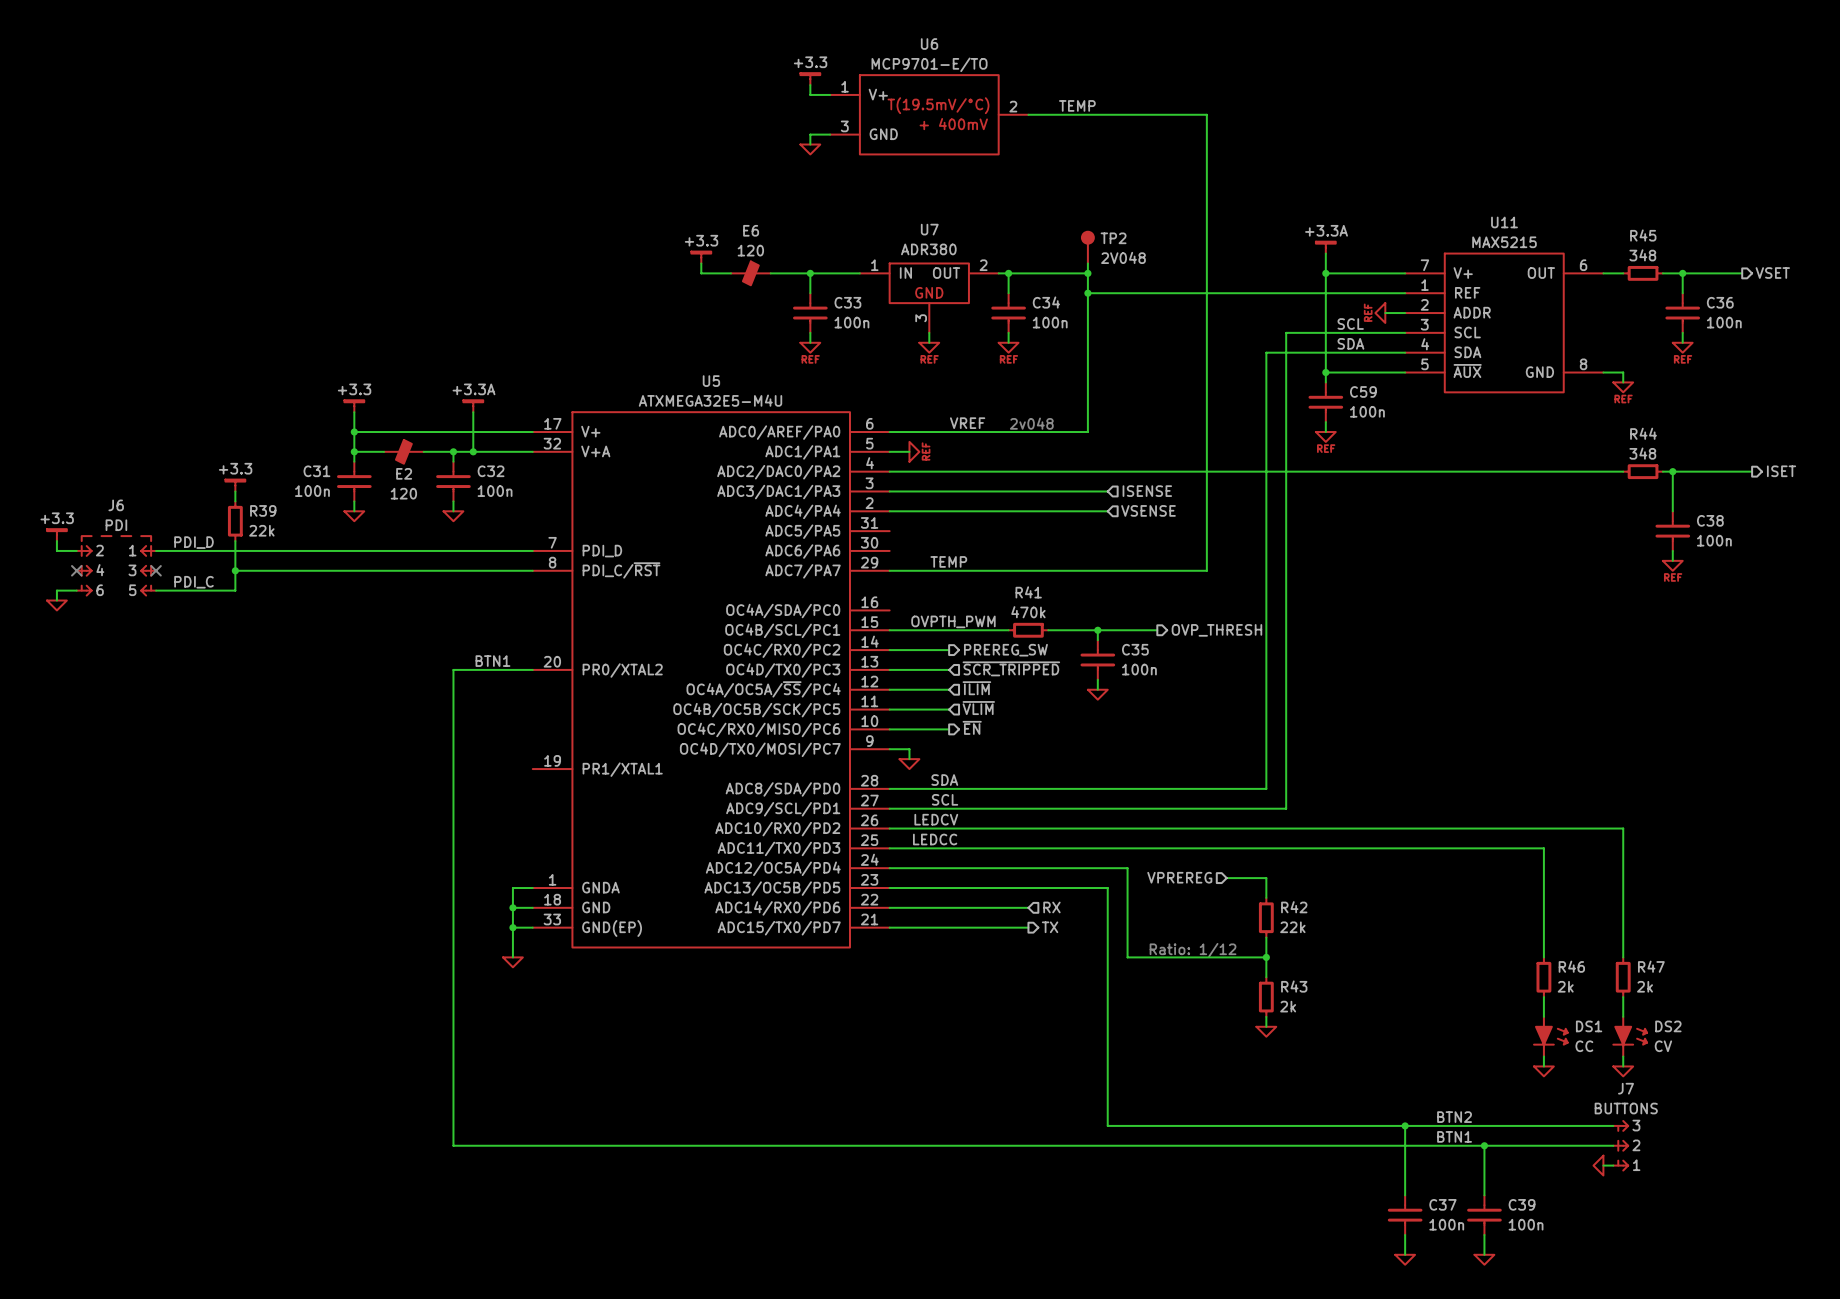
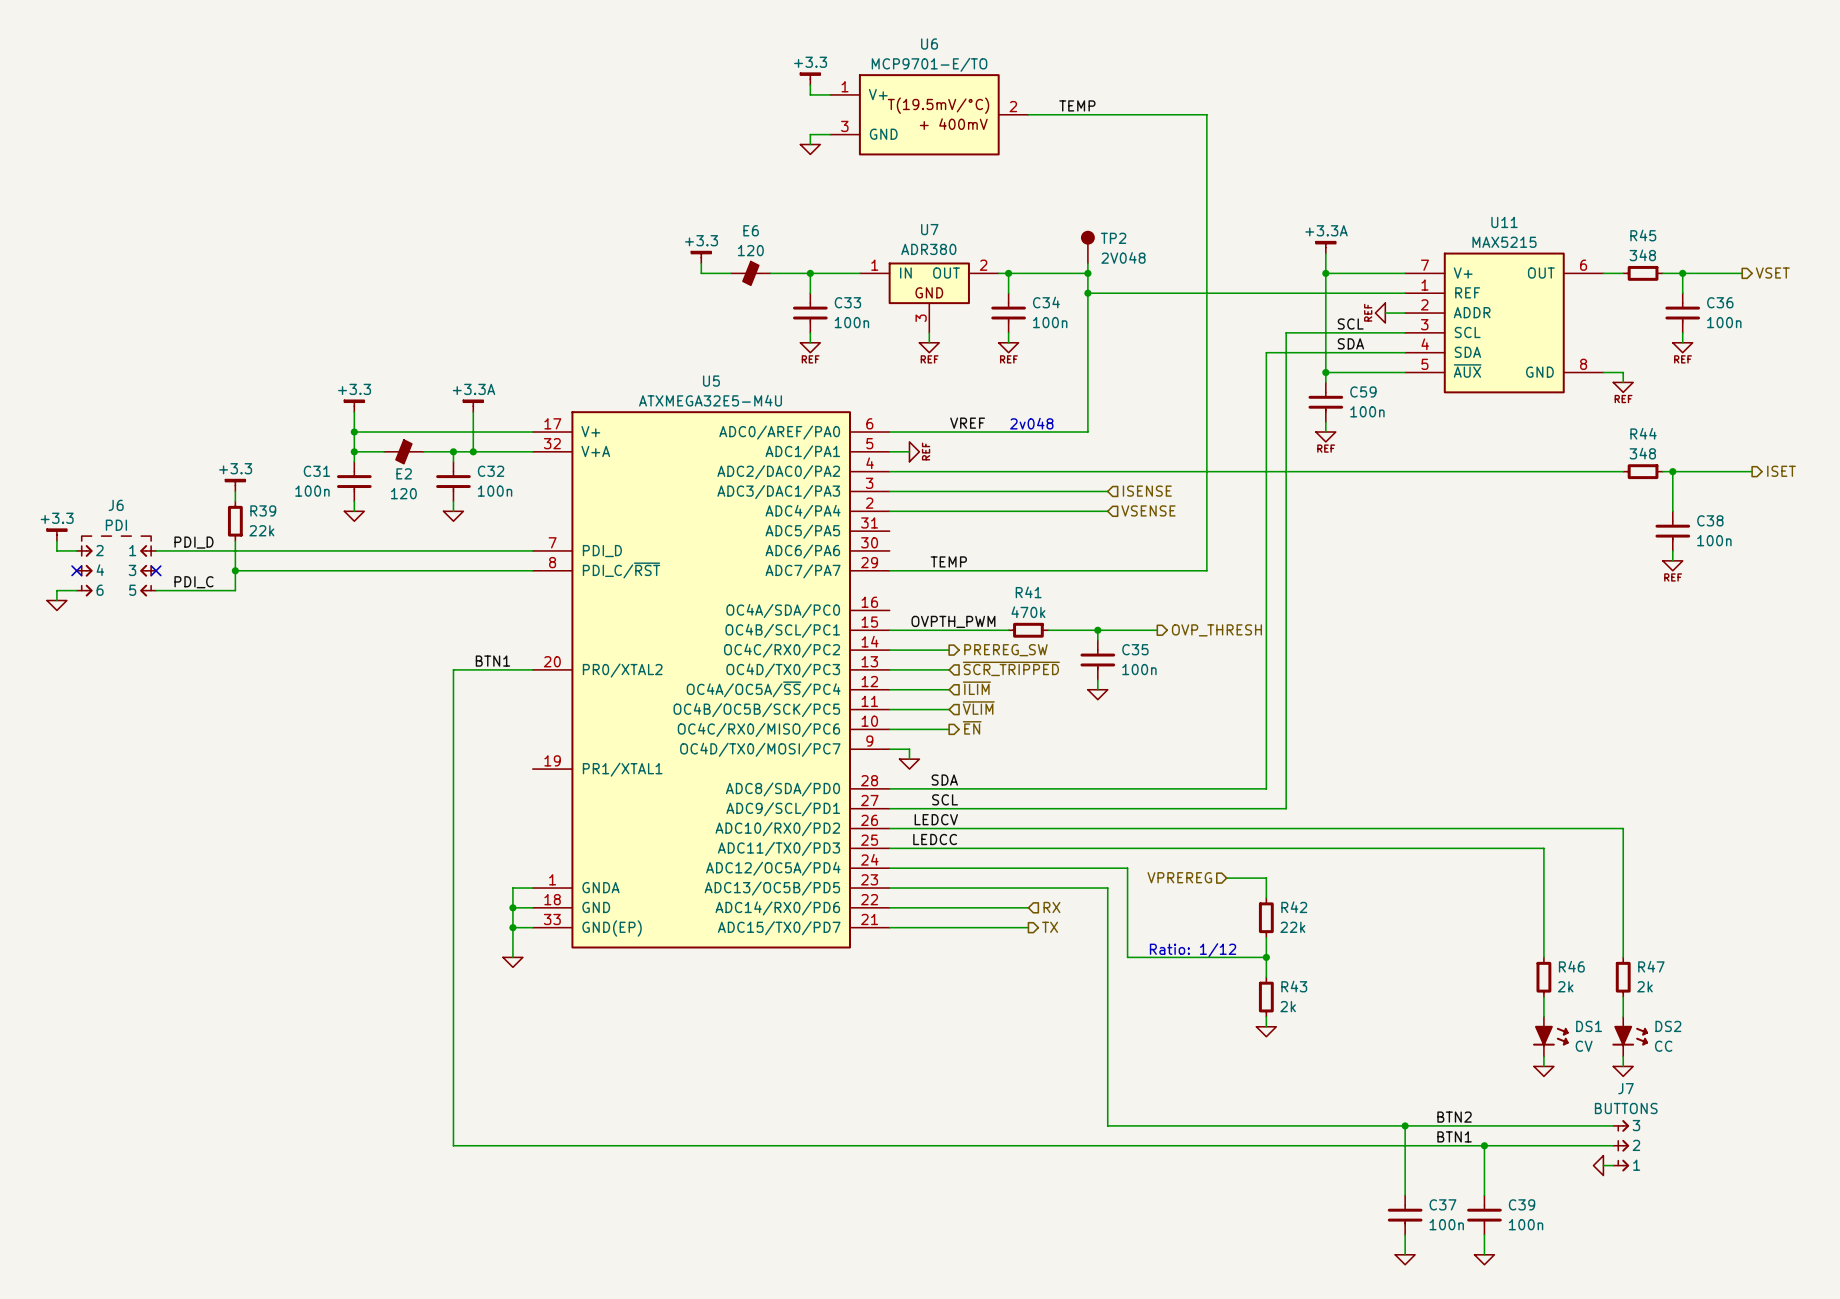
DS1 value: CC (1584, 1046) -> CV (1584, 1046)
DS2 value: CV (1663, 1046) -> CC (1663, 1046)

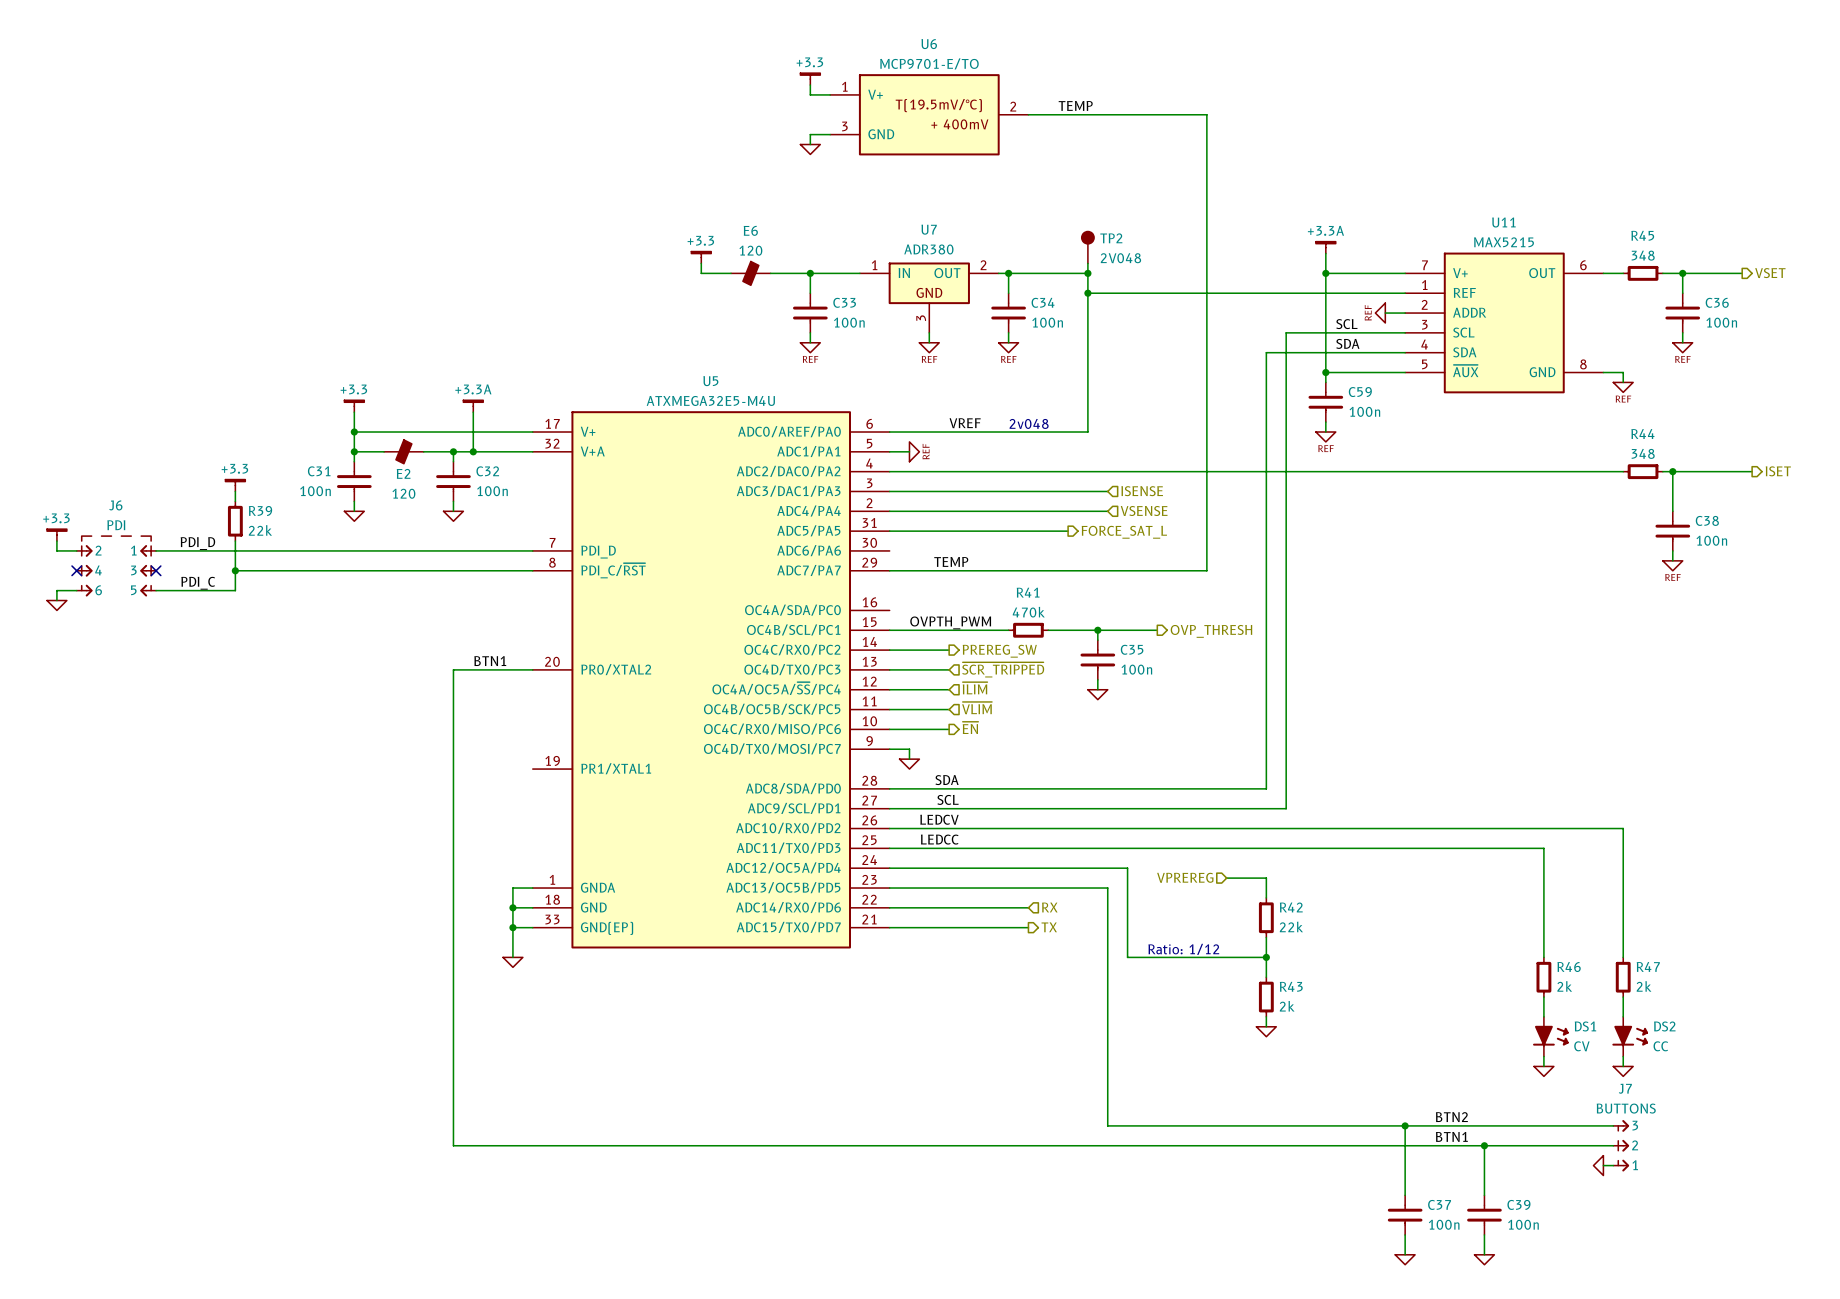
wire: none -> (889, 531) (1068, 531)
hierarchical label: none -> FORCE_SAT_L (1124, 532)

